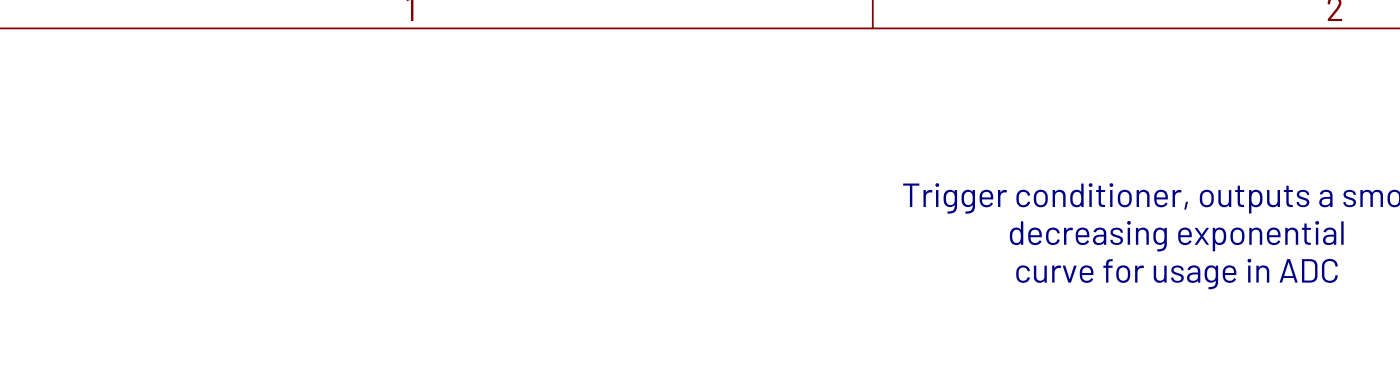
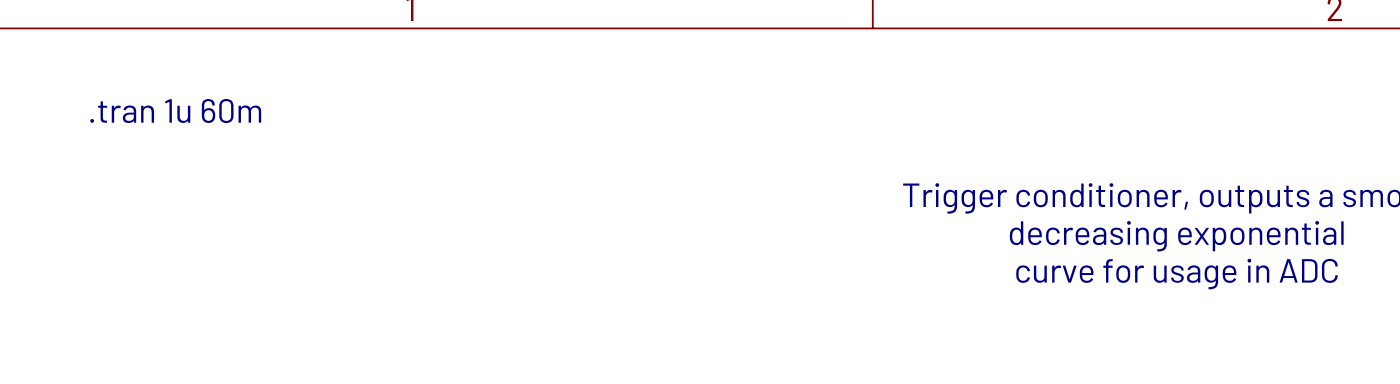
text: none -> .tran 1u 60m (175, 110)

